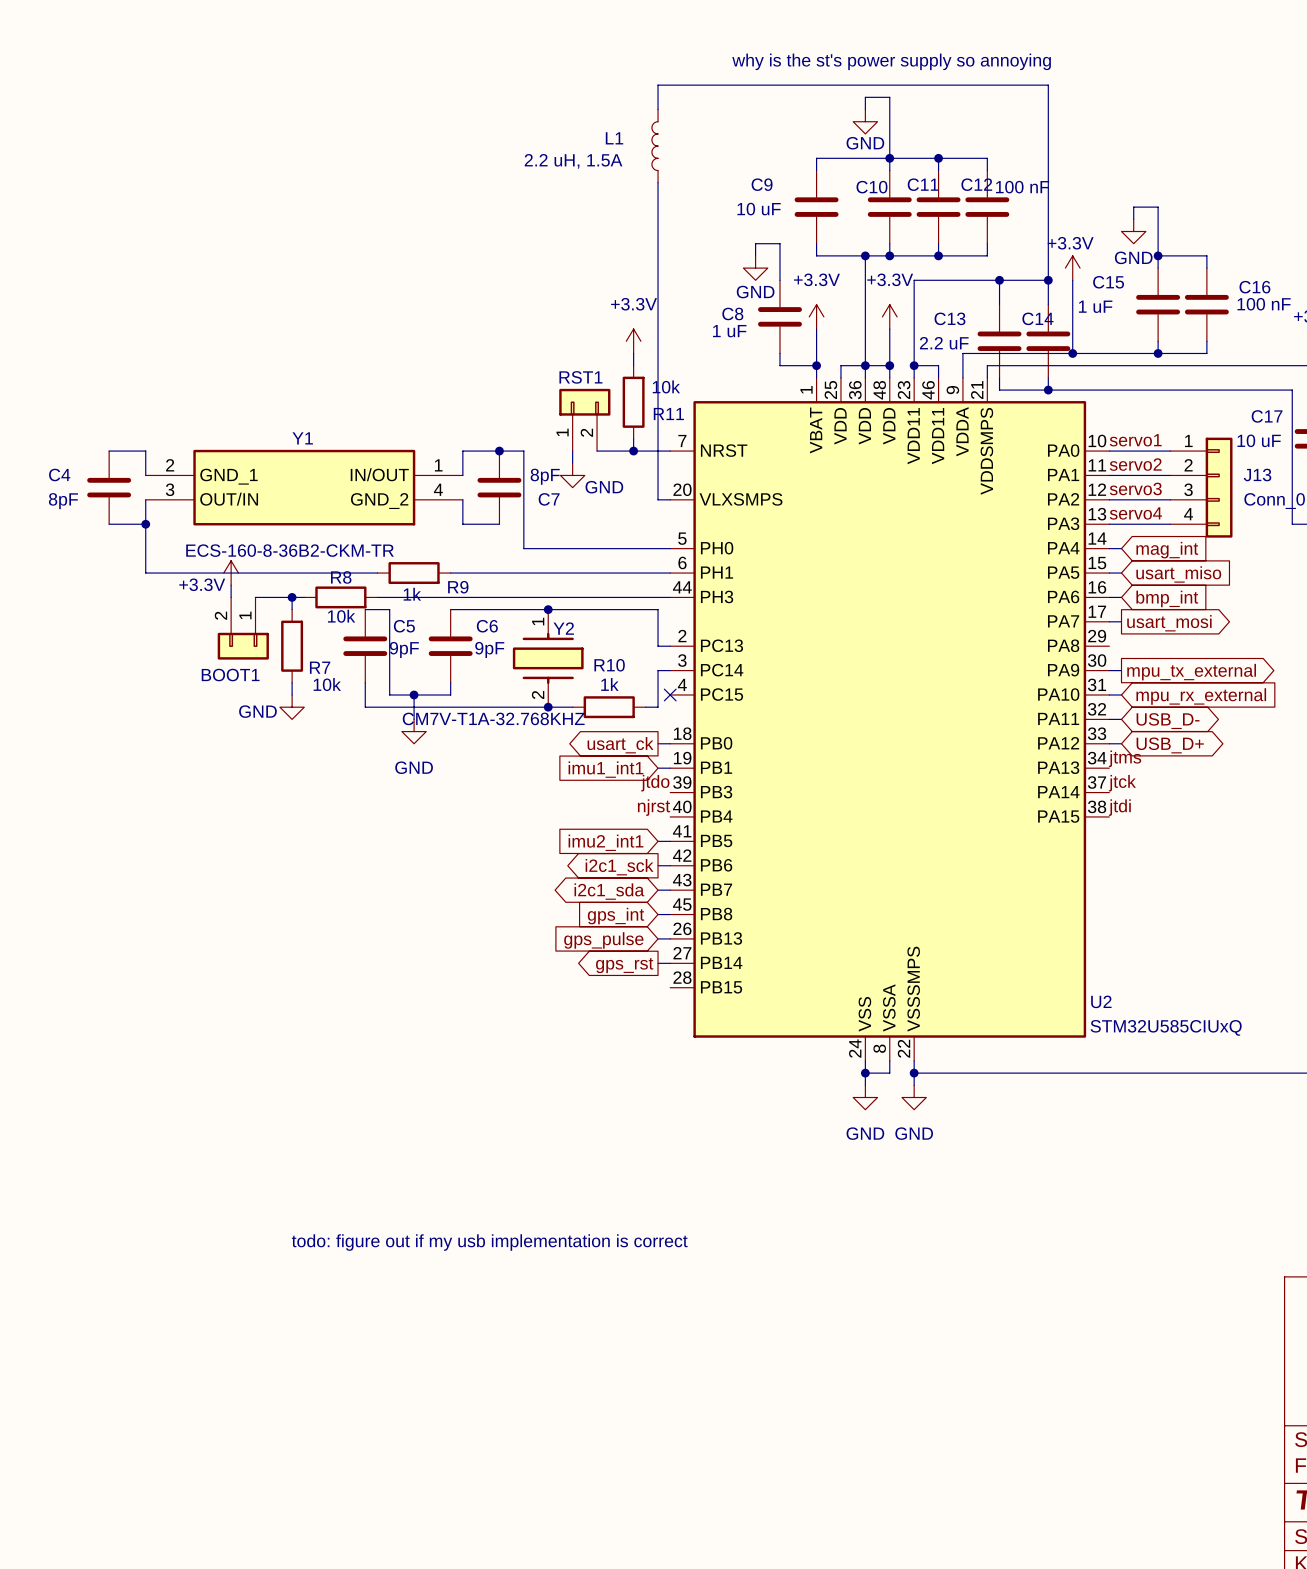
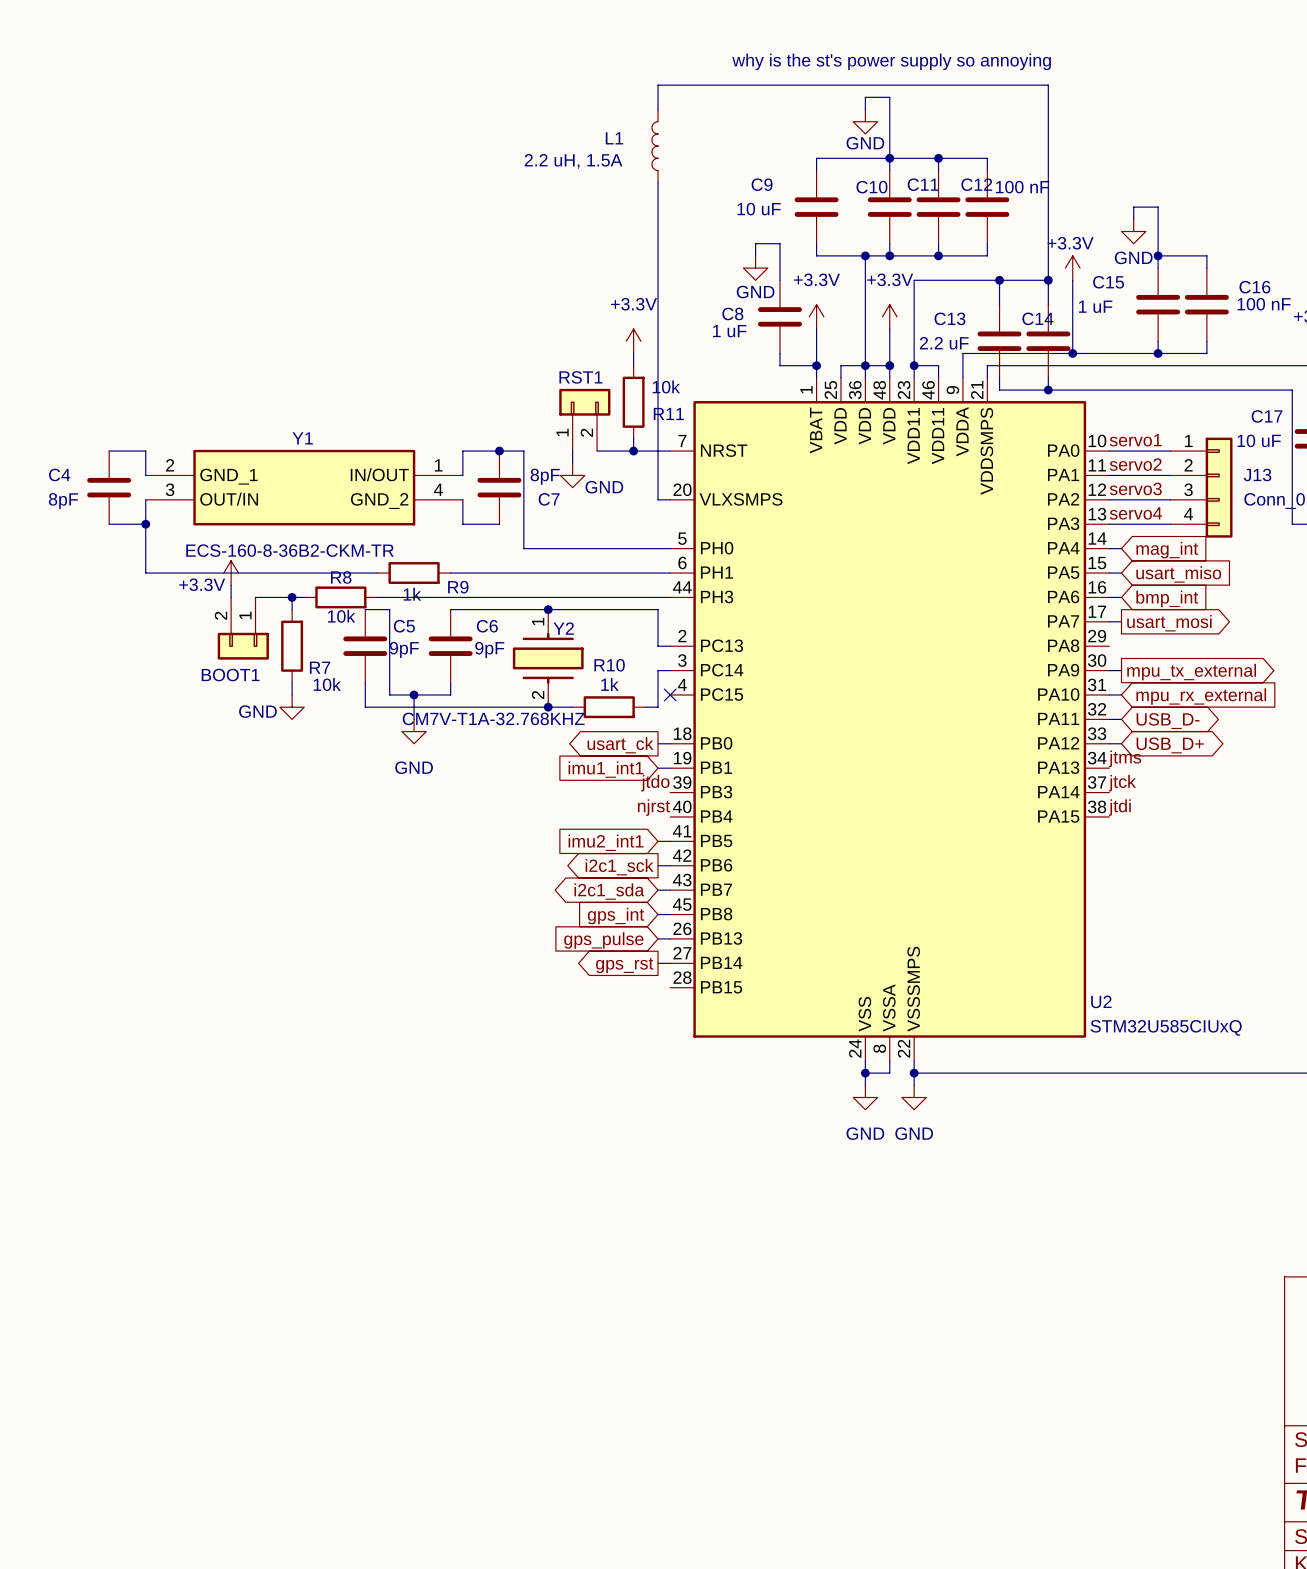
text: todo: figure out if my usb implementation is correct (489, 1242) -> none

